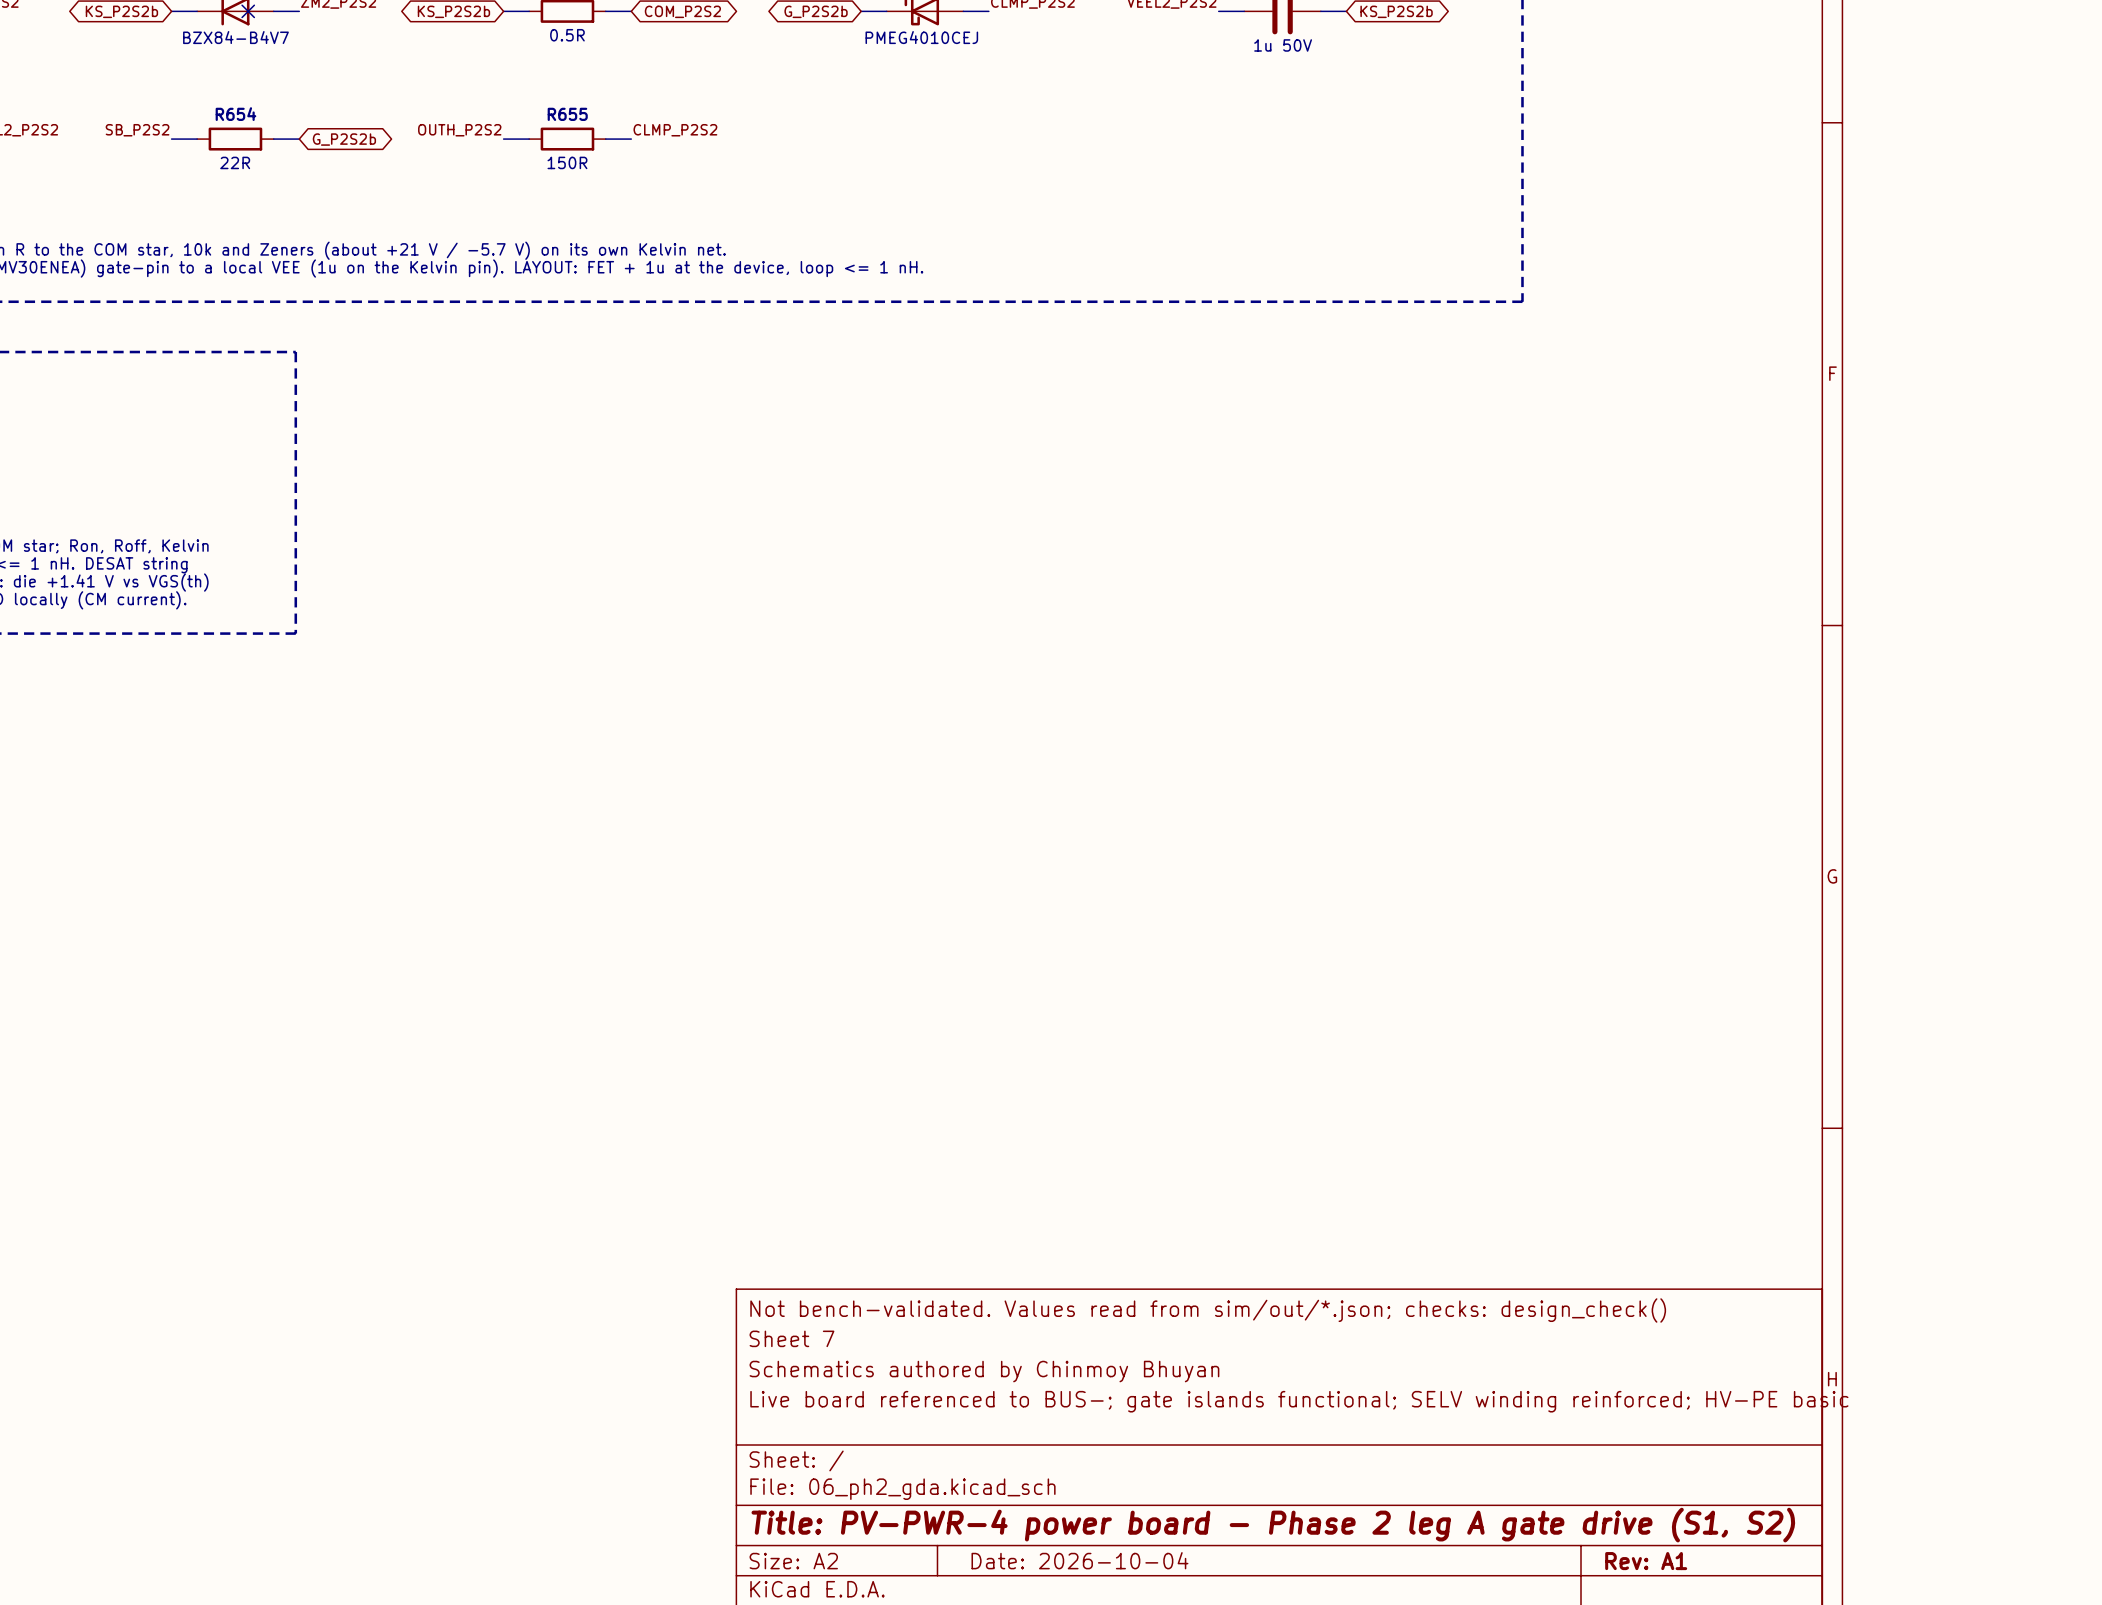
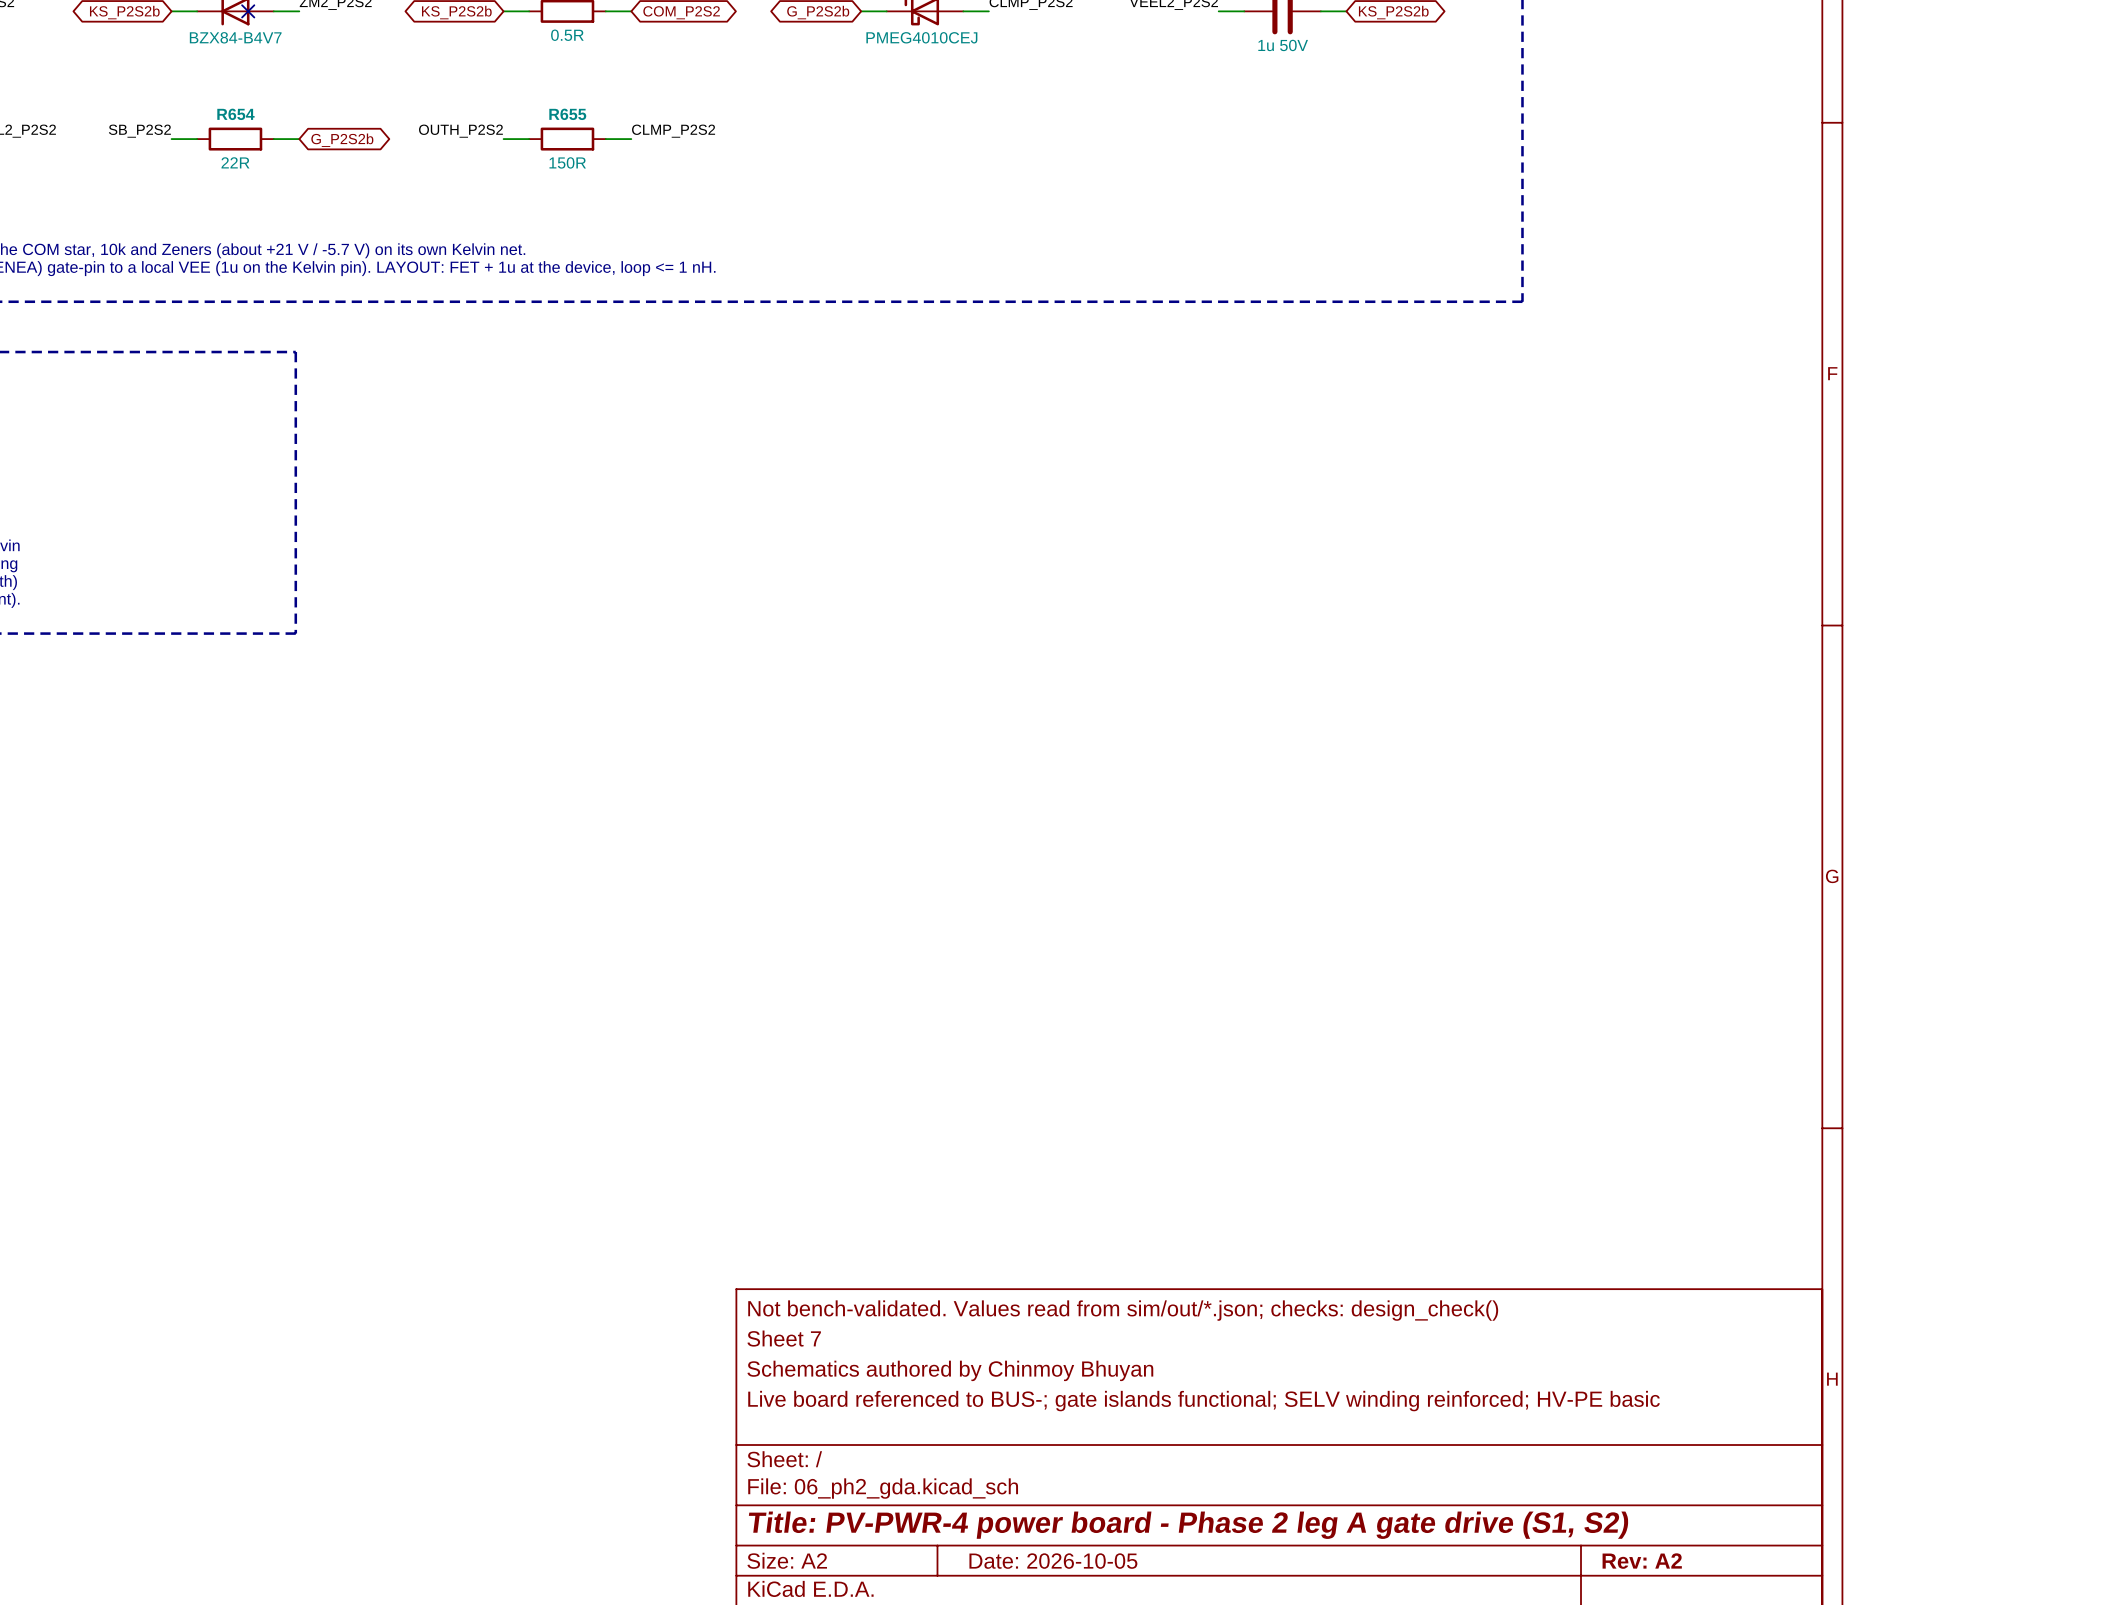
title block: Date: 2026-10-04 (1079, 1560) -> Date: 2026-10-05 (1053, 1561)
title block: Rev: A1 (1646, 1561) -> Rev: A2 (1642, 1561)

